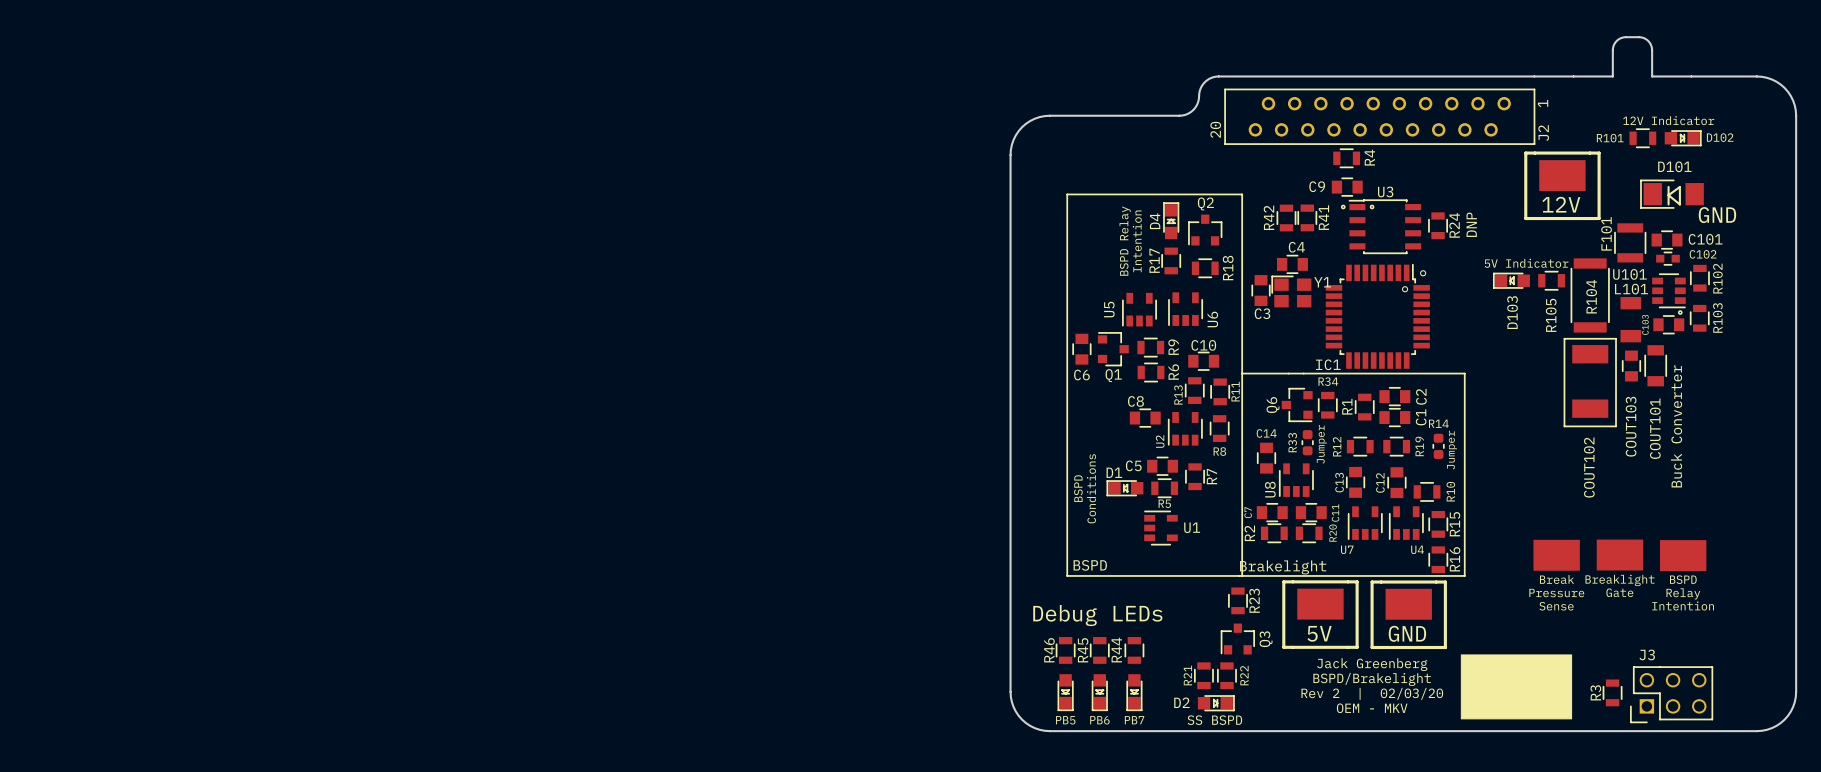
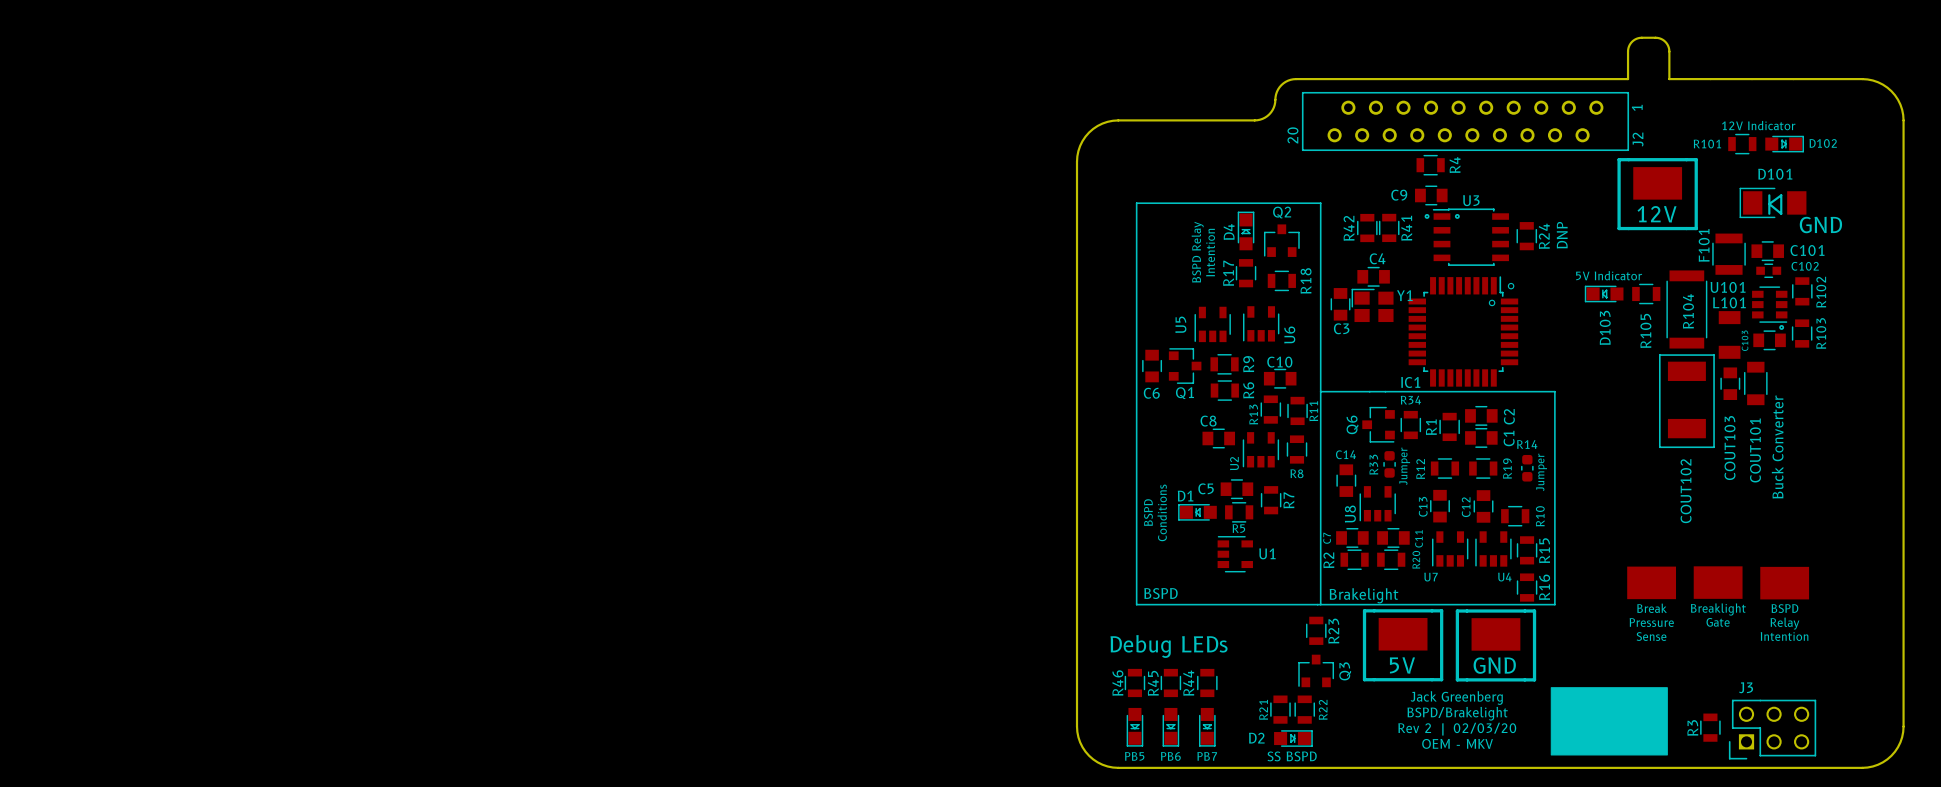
board edge: (1534, 76) (1573, 76) -> (1628, 79) (1628, 47) (1633, 40) (1641, 37) (1659, 38) (1667, 44) (1669, 79)
board edge: (1612, 76) (1613, 46) (1617, 39) (1625, 37) (1642, 37) (1650, 43) (1652, 76) -> (1710, 79) (1752, 79)

